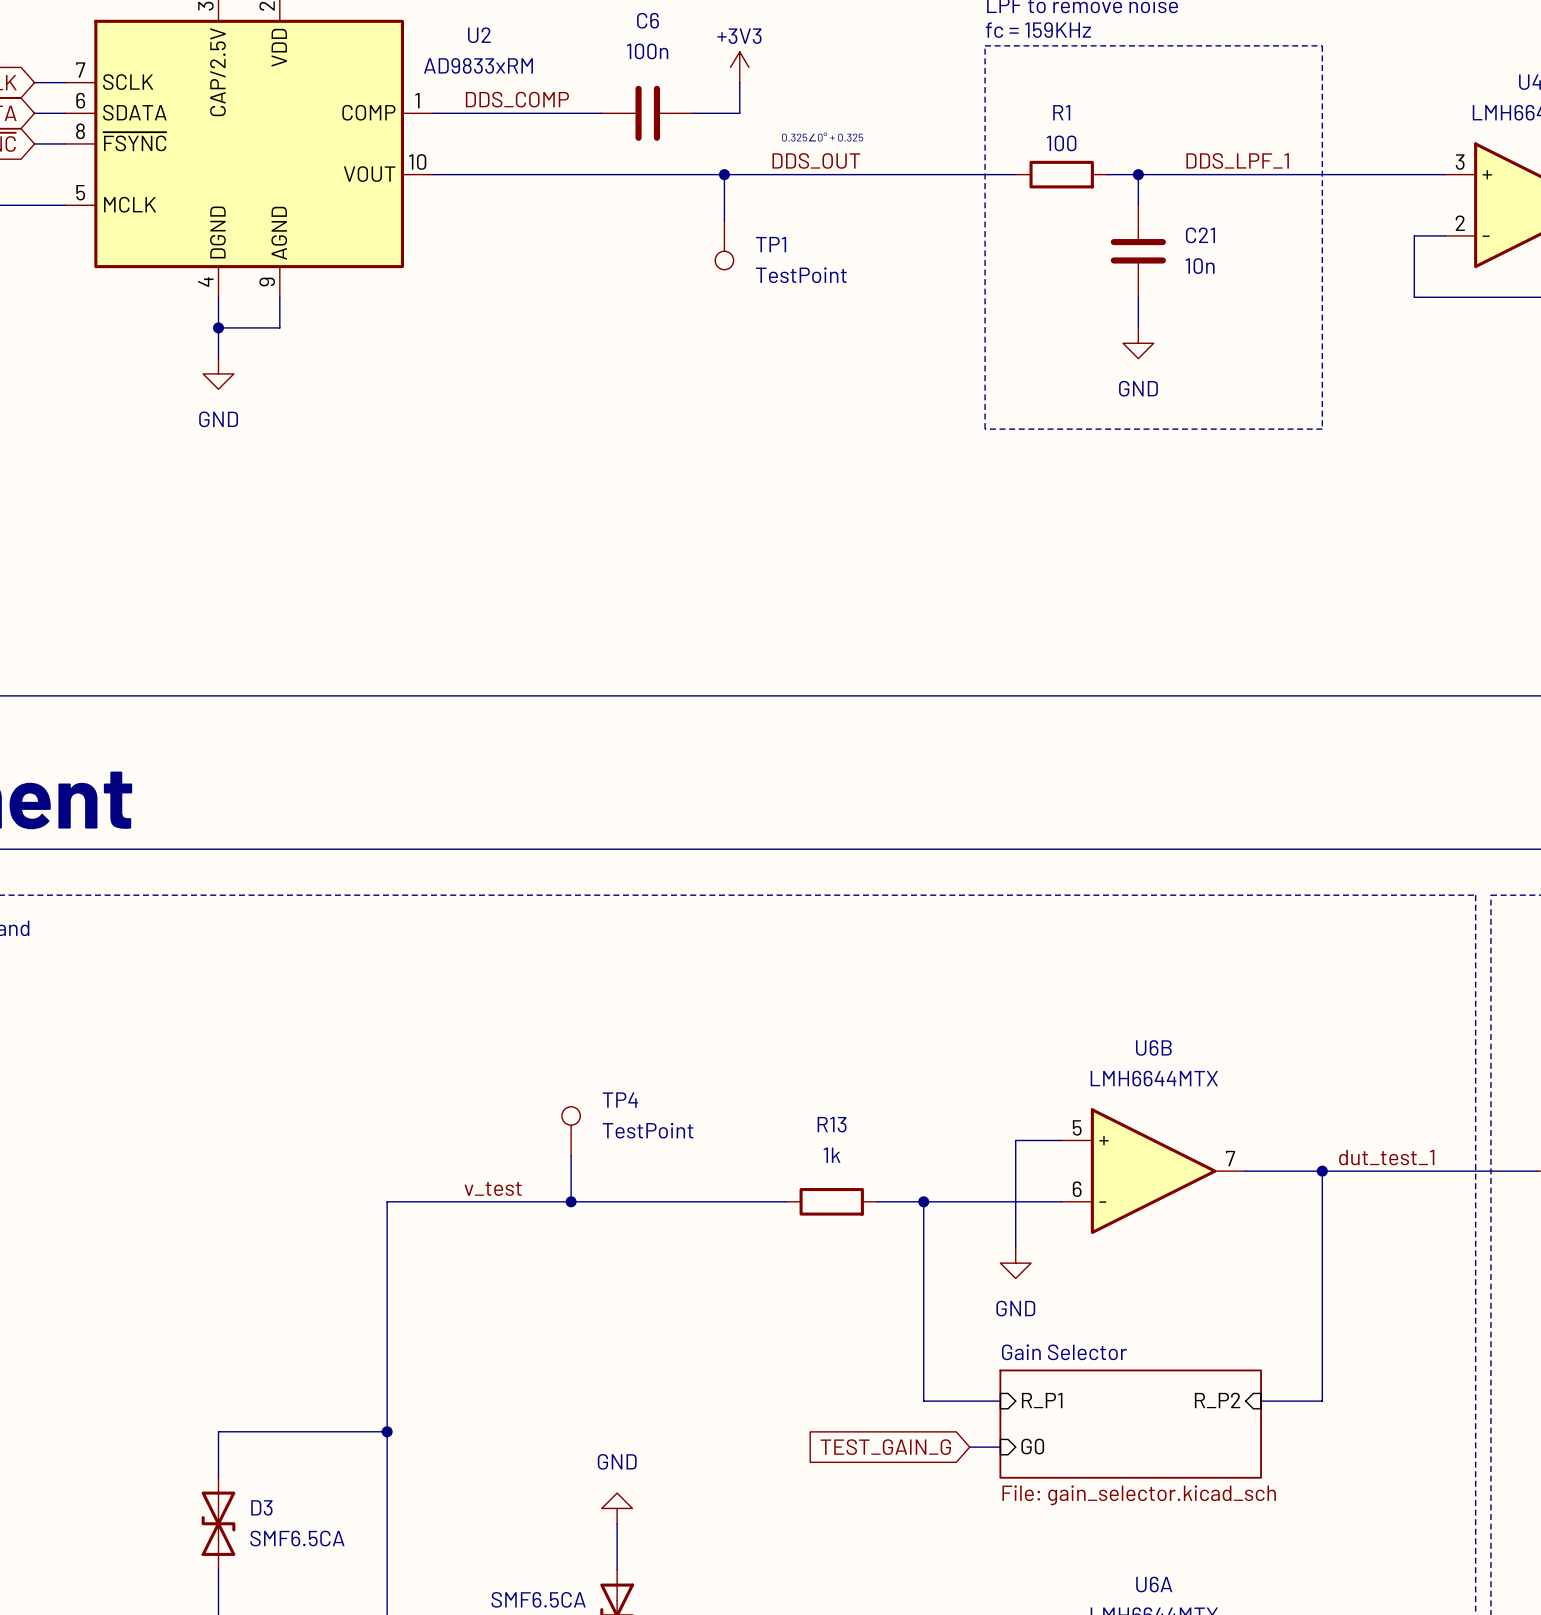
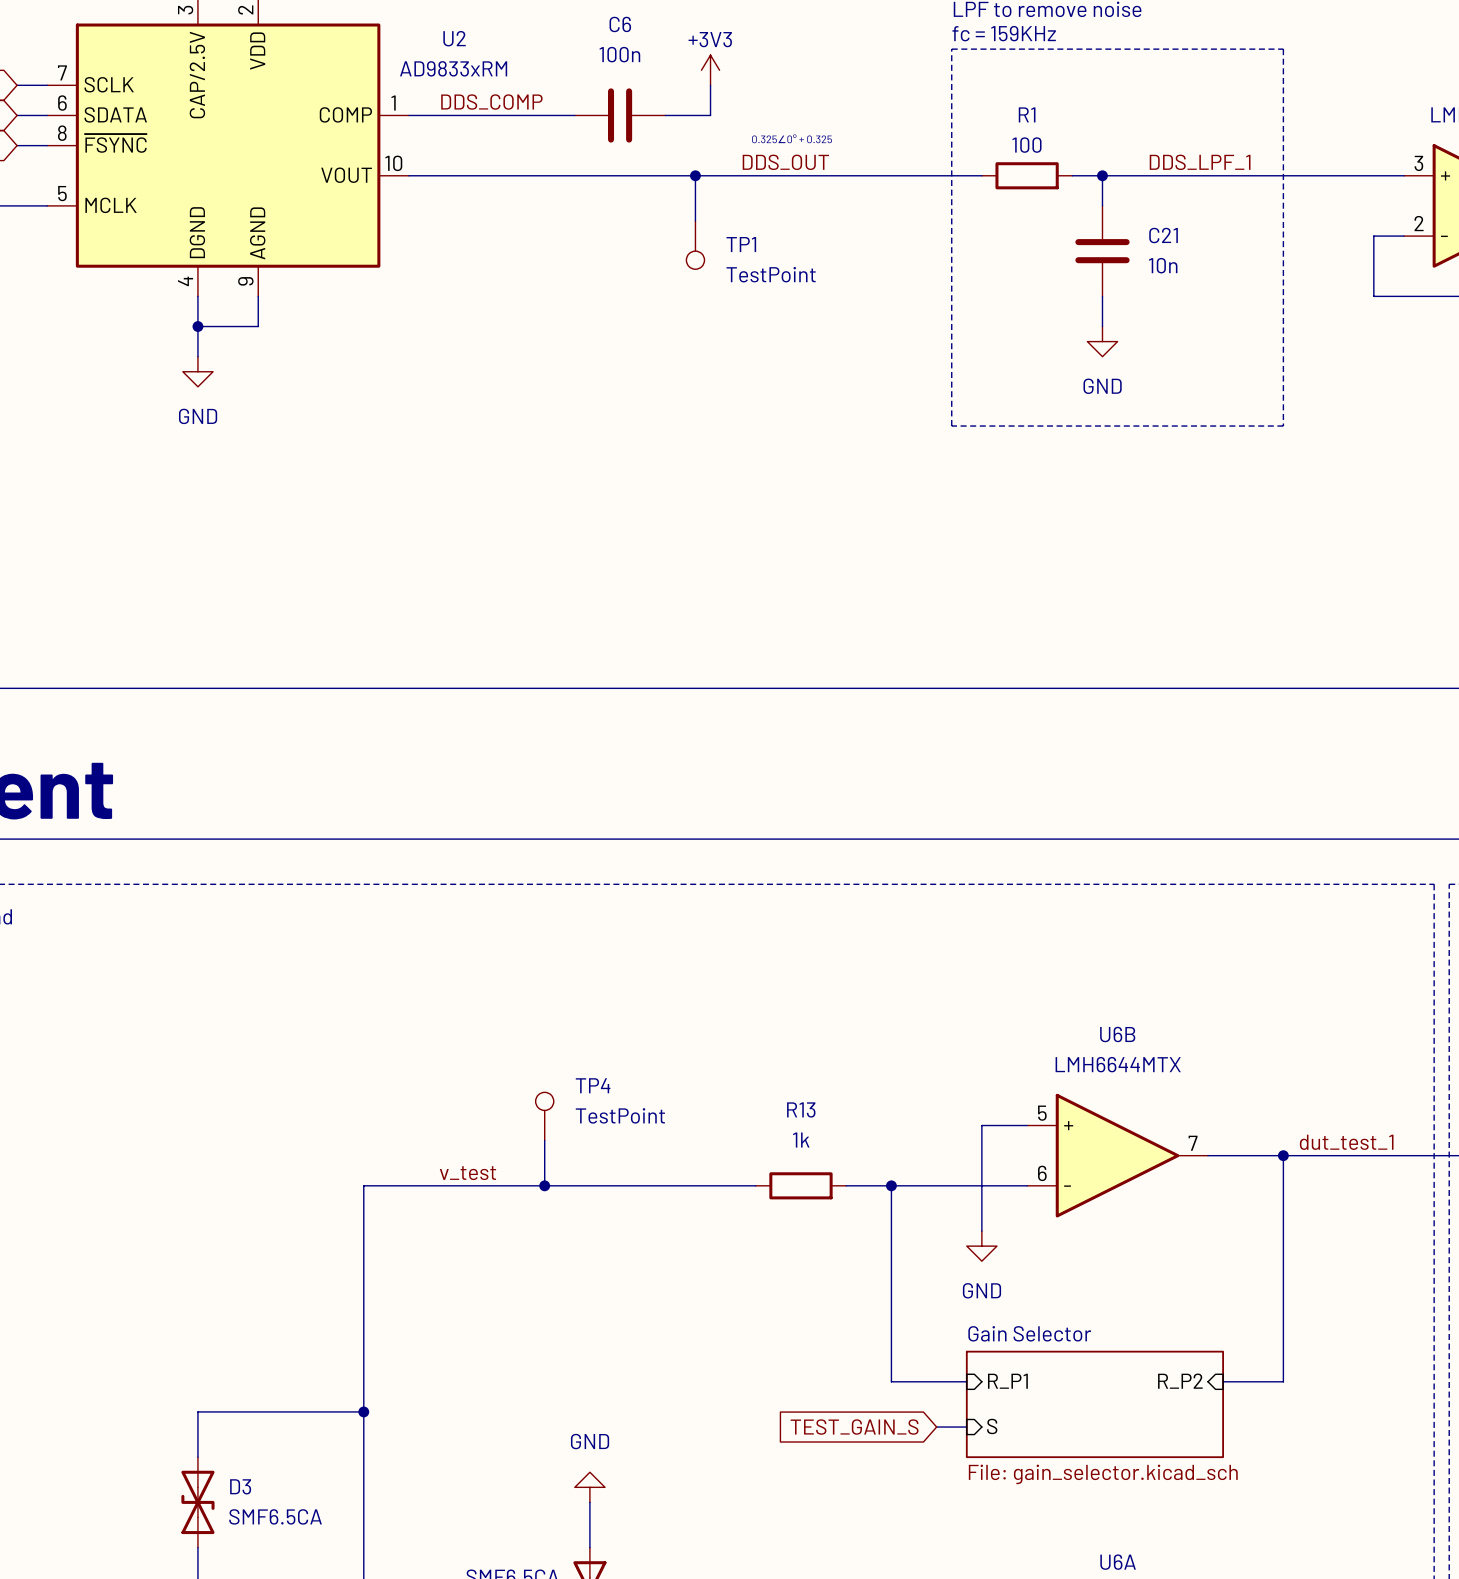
sheet pin: G0 (1032, 1446) -> S (992, 1426)
global label: TEST_GAIN_G (885, 1447) -> TEST_GAIN_S (854, 1427)

